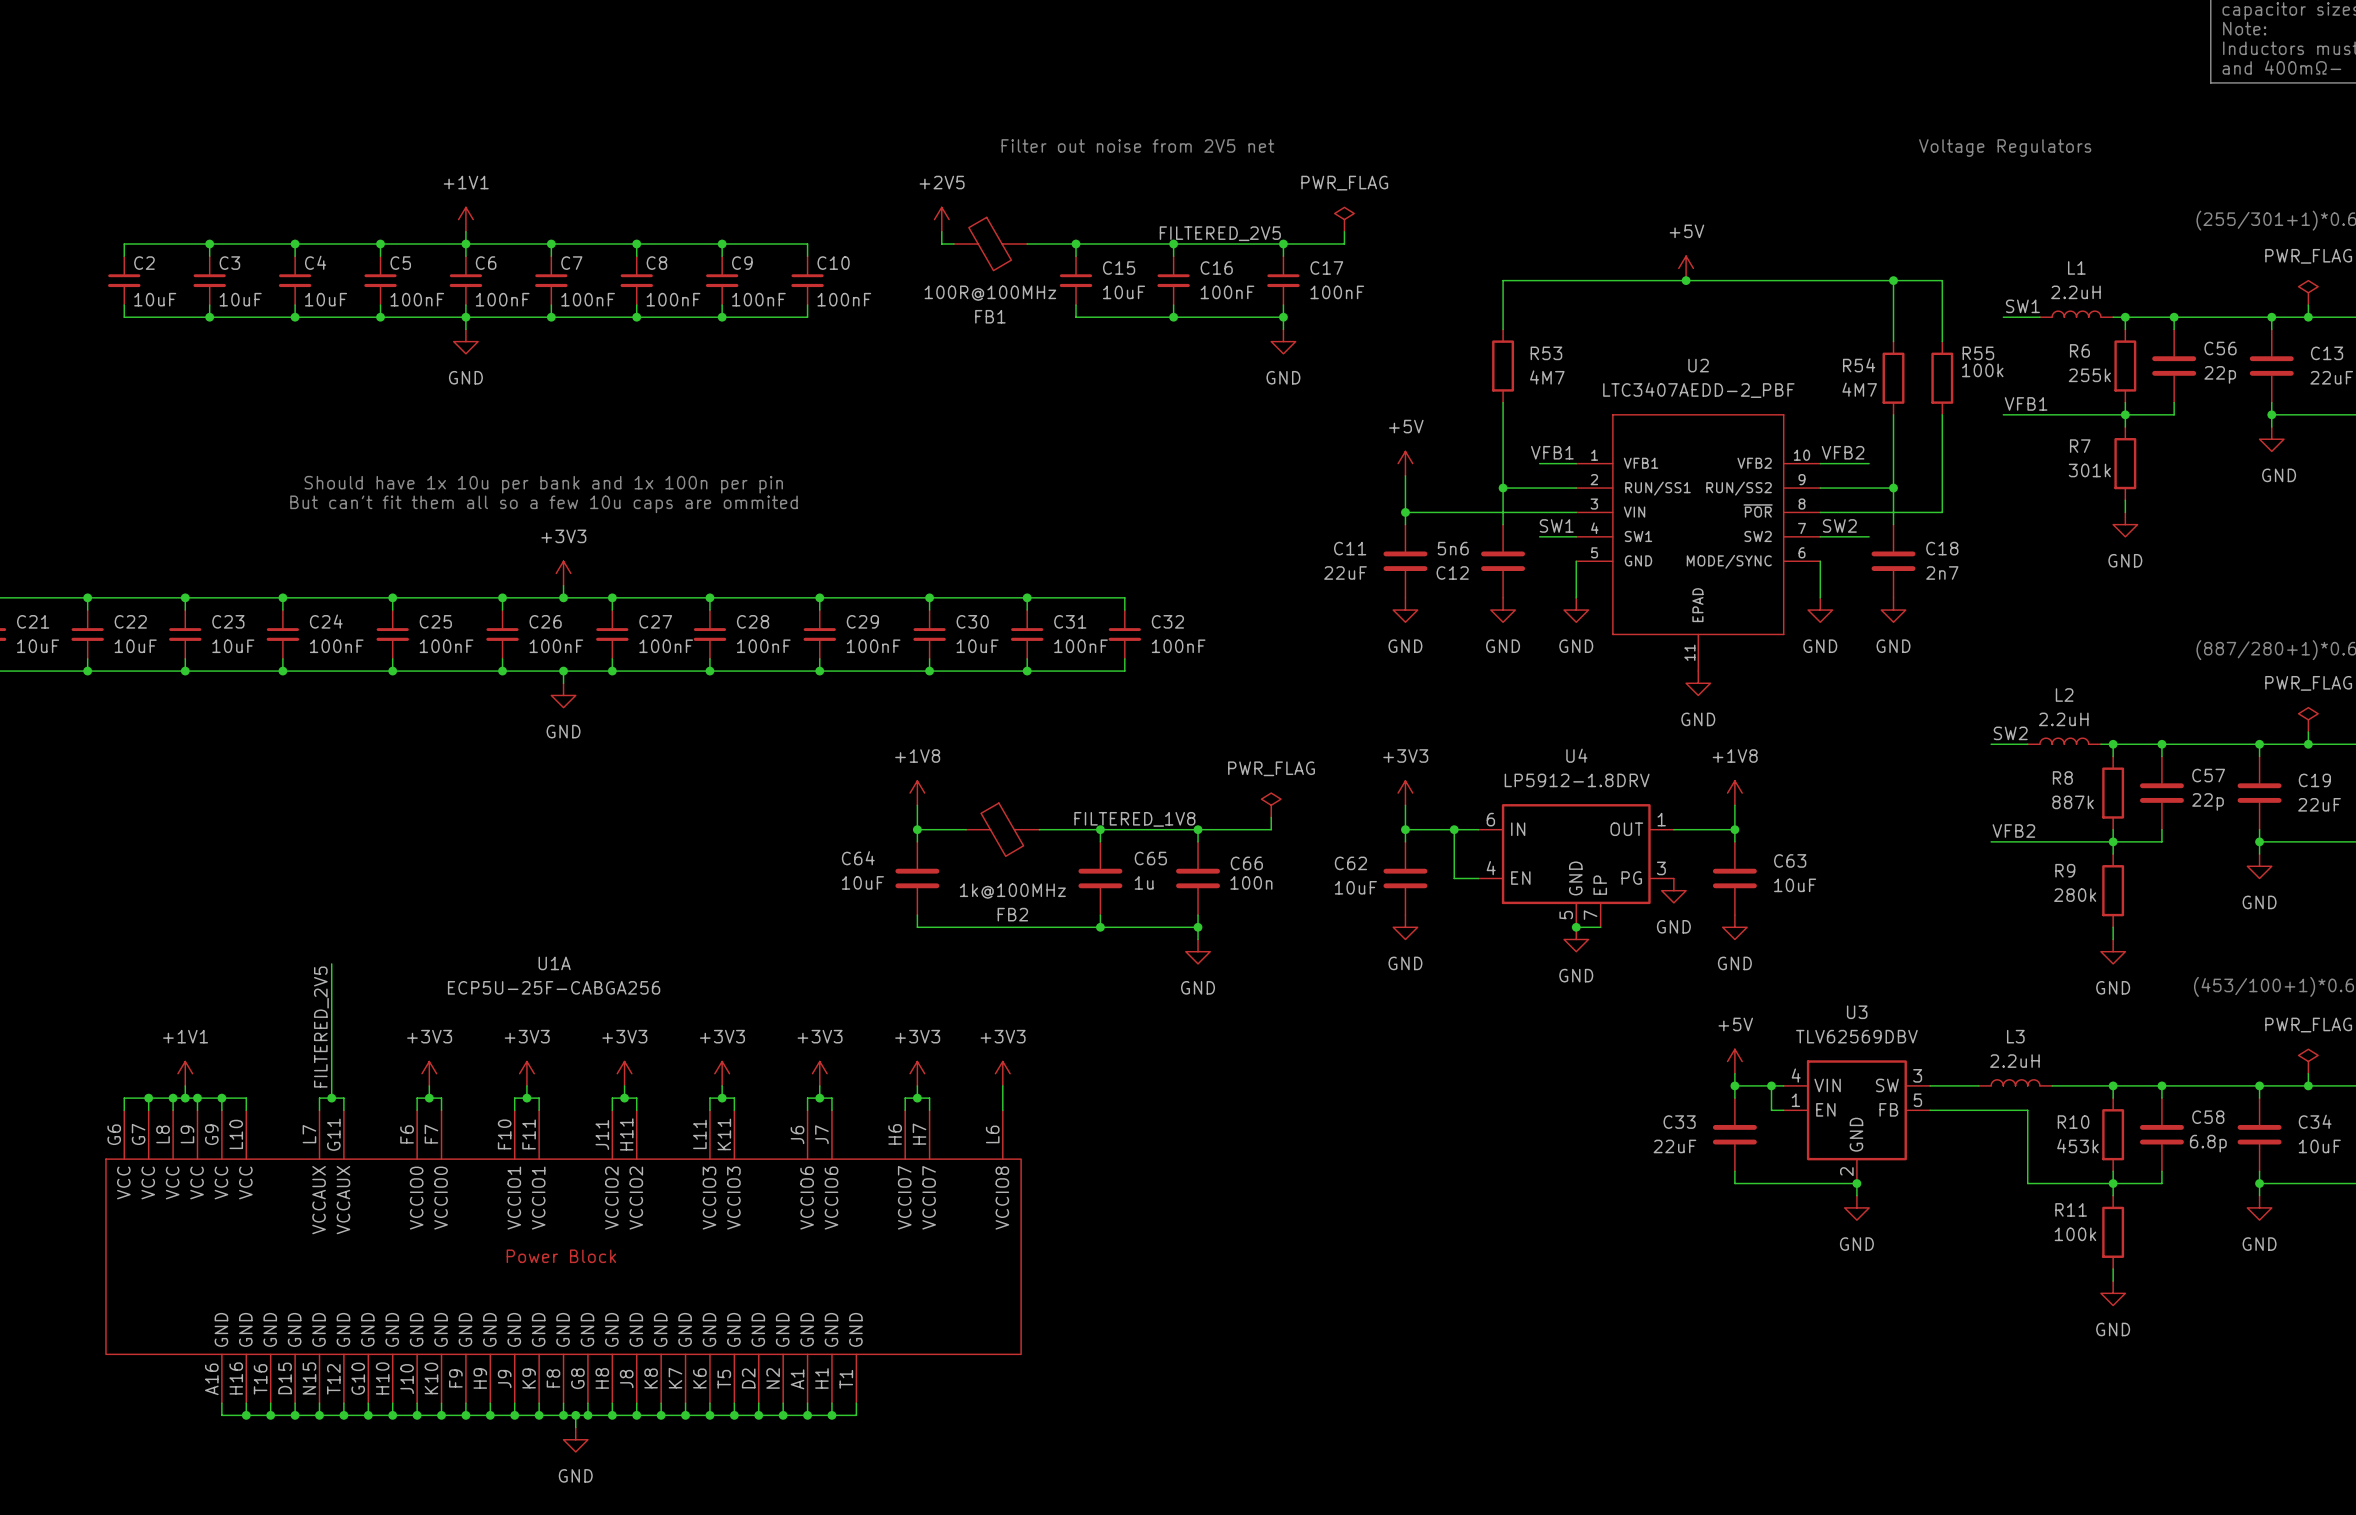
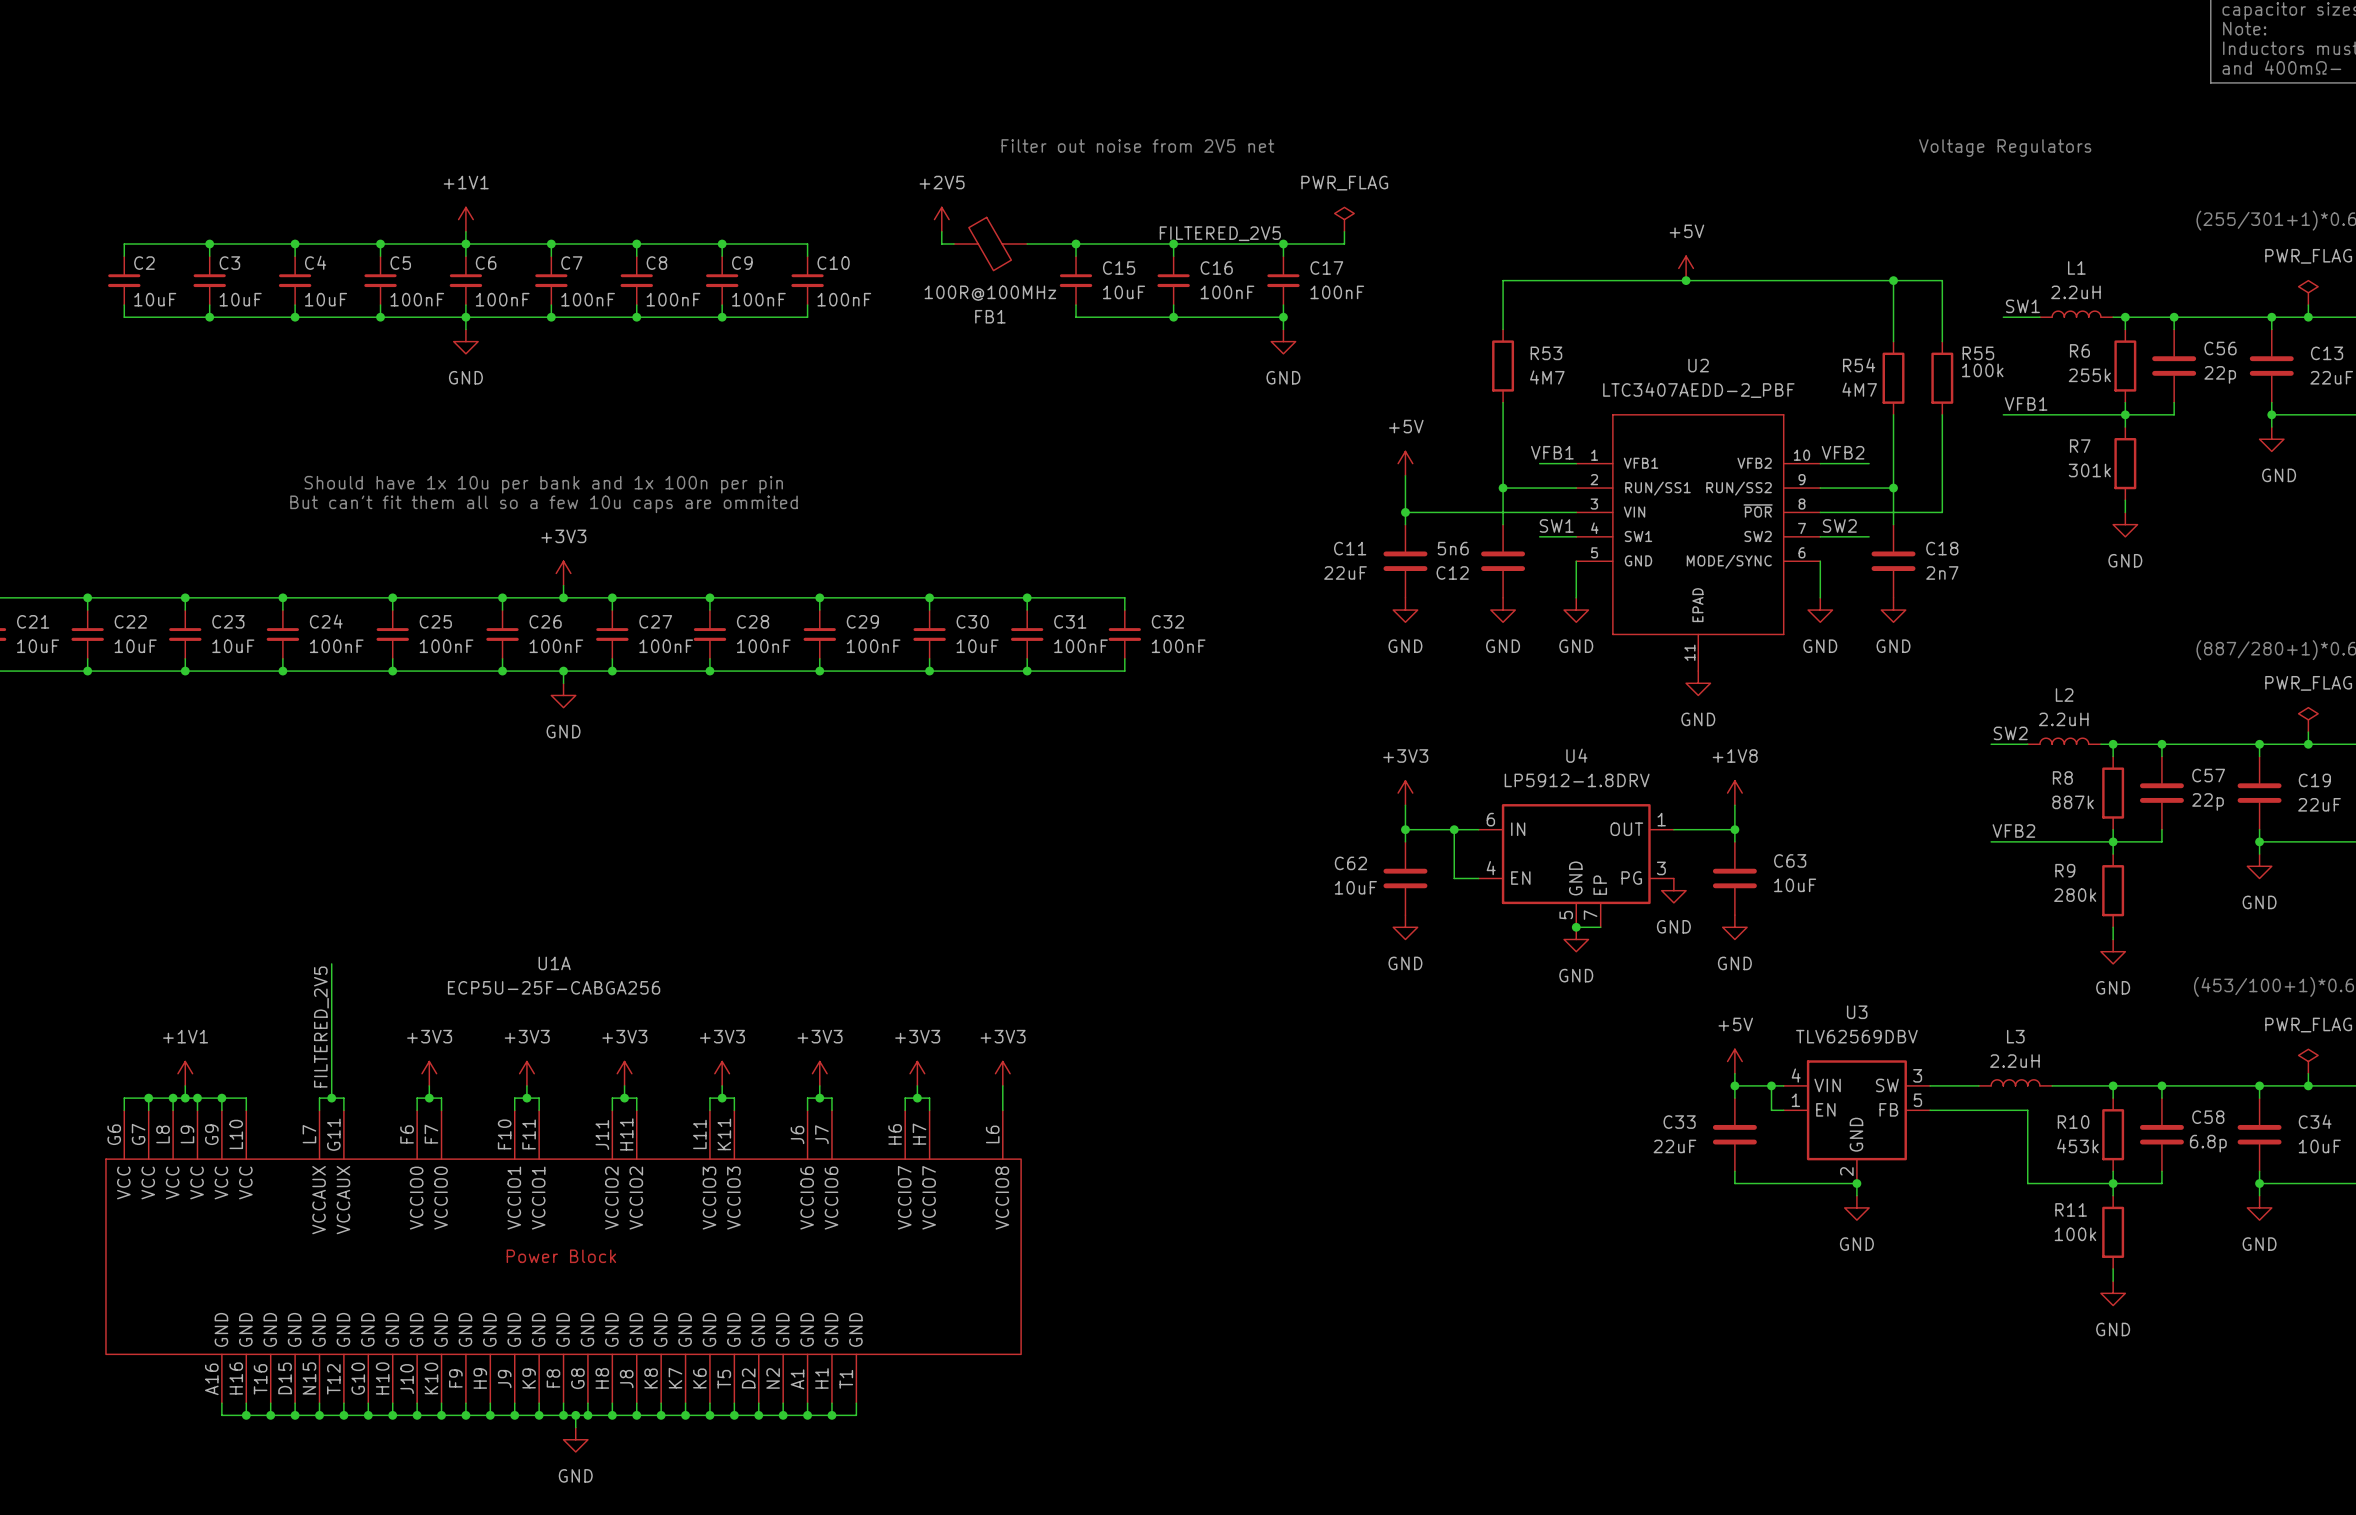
power symbol: +1V8 (917, 793) -> none
wire: (917, 805) (917, 841) -> none
power symbol: PWR_FLAG (1271, 805) -> none
wire: (1271, 817) (1271, 829) (1039, 829) -> none
label: FILTERED_1V8 (1134, 819) -> none
wire: (917, 829) (966, 829) -> none
junction: (917, 829) -> none
FB2: 1k@100MHz (1002, 829) -> none
wire: (1100, 829) (1100, 841) -> none
junction: (1100, 829) -> none
wire: (1198, 829) (1198, 841) -> none
junction: (1198, 829) -> none
C64: 10uF (917, 878) -> none
C65: 1u (1100, 878) -> none
C66: 100n (1198, 878) -> none
wire: (917, 915) (917, 927) (1198, 927) -> none
wire: (1100, 915) (1100, 927) -> none
wire: (1198, 915) (1198, 939) -> none
junction: (1100, 927) -> none
junction: (1198, 927) -> none
power symbol: GND (1198, 951) -> none

